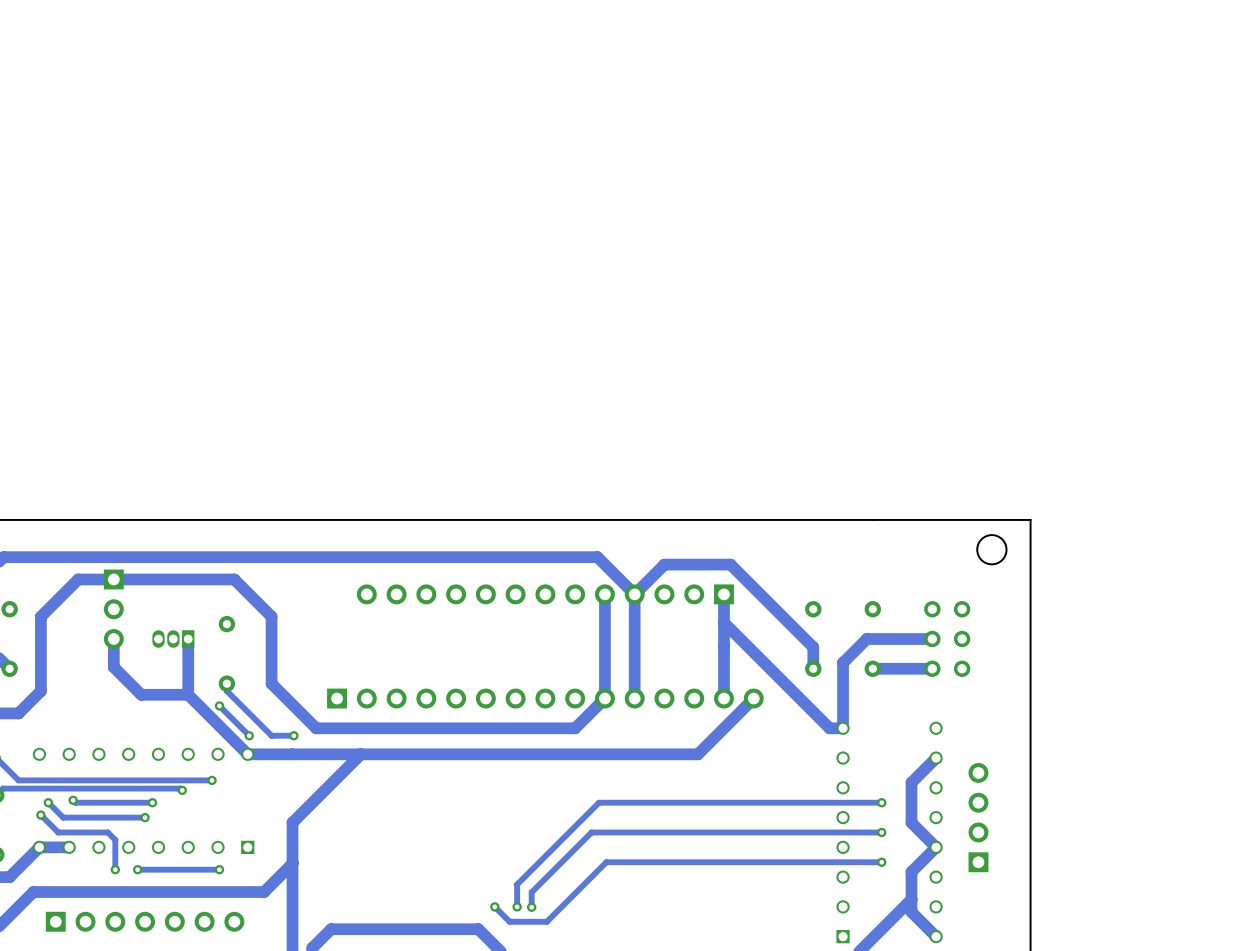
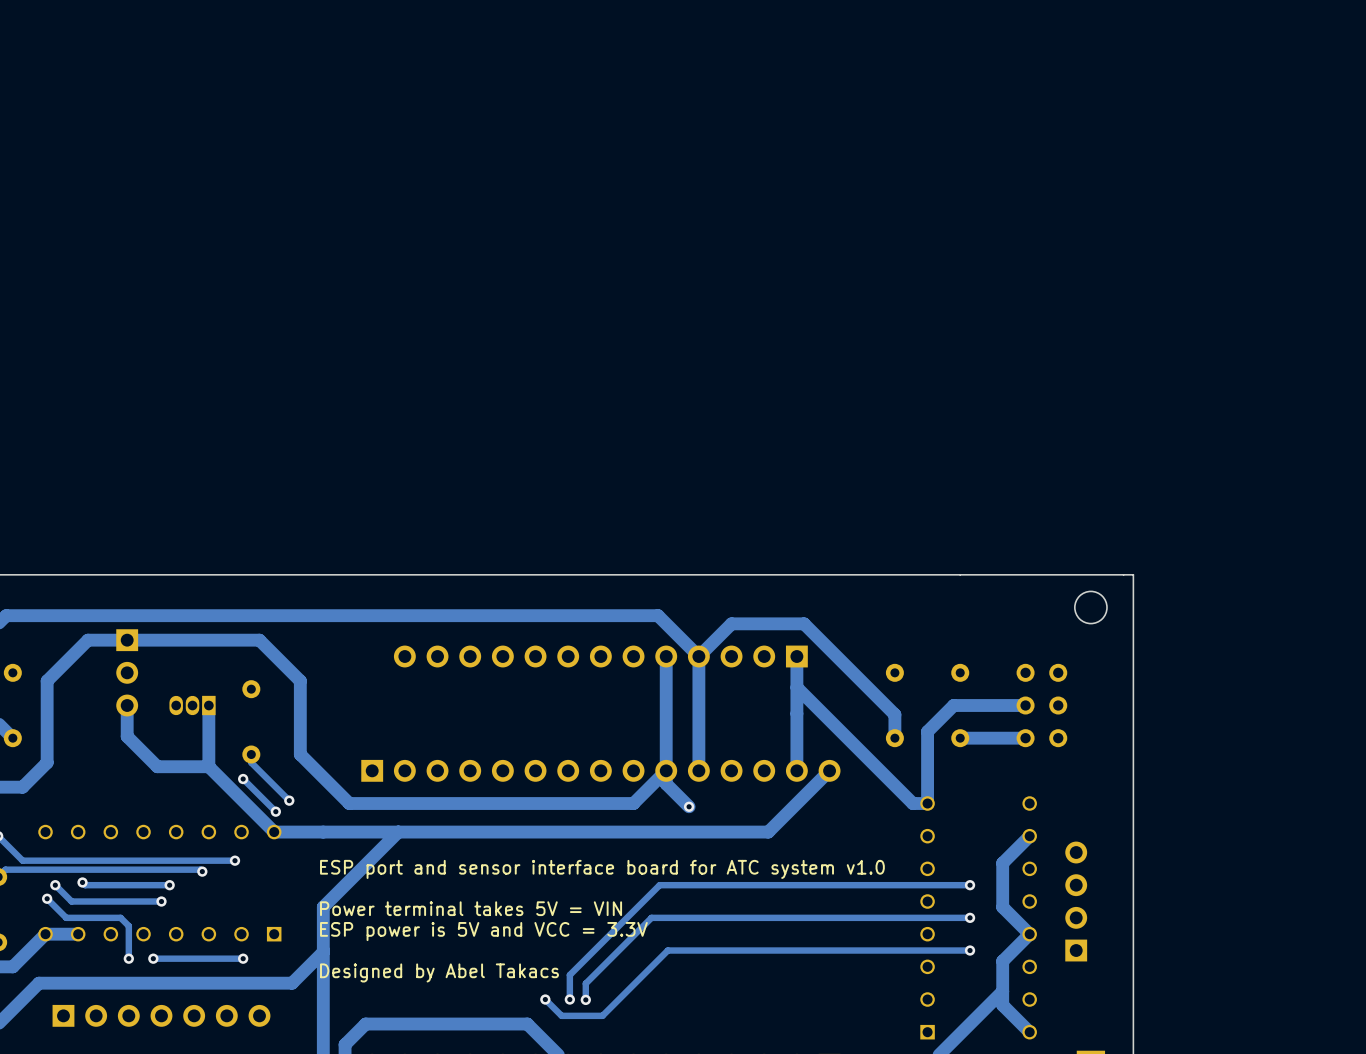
track: none -> (666, 770) (666, 783) (689, 806)
track: (261, 725) (271, 735) (293, 735) -> none
via: none -> (689, 806)
via position: (293, 735) -> (289, 800)
text: none -> ESP port and sensor interface board for ATC system v1.0 (602, 869)
text: none -> Power terminal takes 5V = VIN (471, 908)
text: none -> ESP power is 5V and VCC = 3.3V (483, 931)
text: none -> Designed by Abel Takacs (439, 972)

